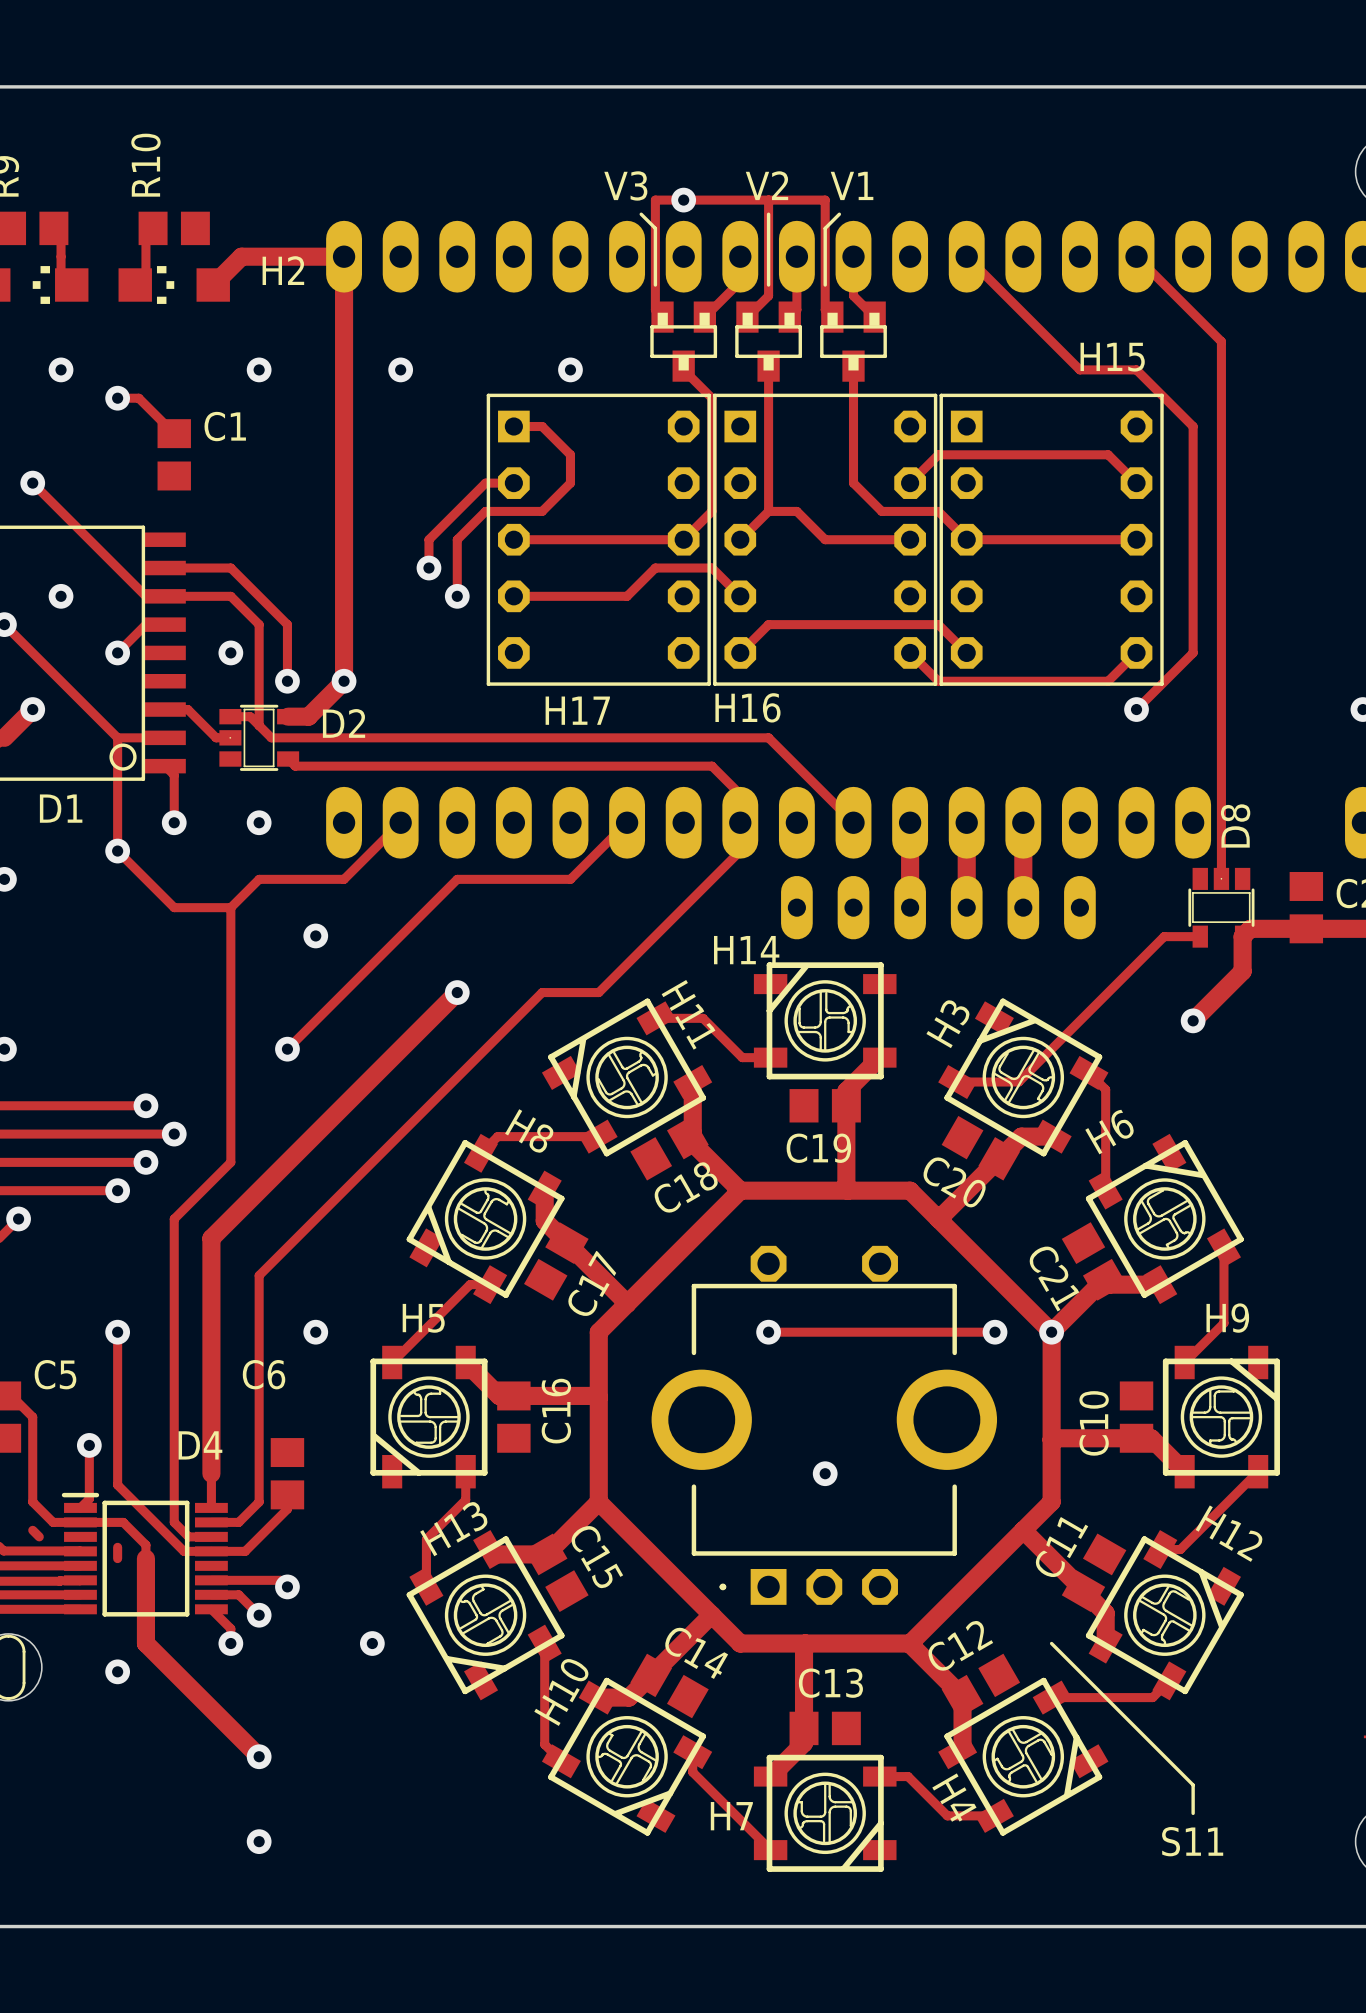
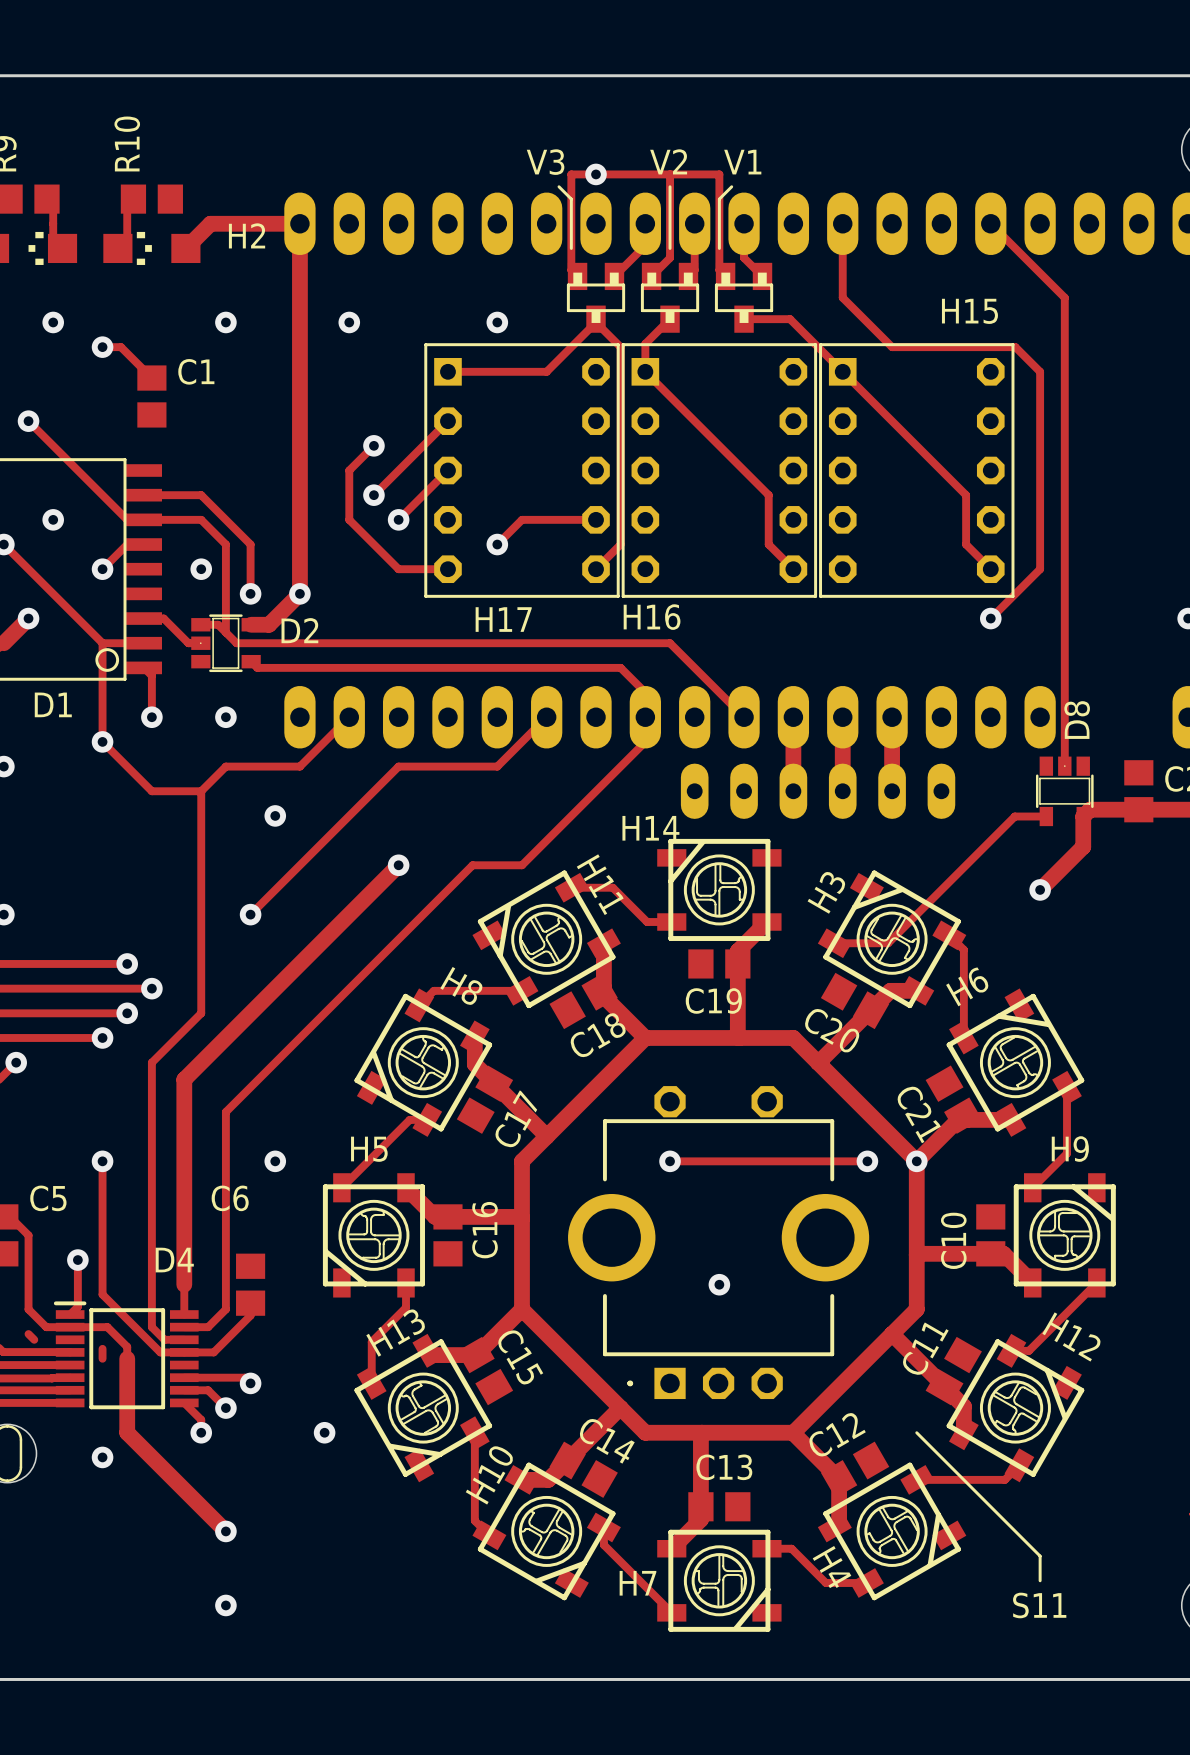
track: (966, 256) (1079, 369) (1136, 369) (1164, 398) -> (842, 223) (842, 297) (892, 347) (1015, 347)
track: (768, 366) (768, 511) -> (670, 319) (645, 343) (645, 371) (768, 495) (768, 544) (793, 569)
track: (853, 366) (853, 483) (881, 511) (938, 511) (966, 539) (1136, 539) -> (744, 319) (790, 319) (966, 495) (966, 544) (990, 569)
track: none -> (596, 322) (546, 371) (472, 371)
track: (542, 426) (570, 454) (570, 483) (542, 511) (485, 511) -> (447, 421) (423, 445)
track: (513, 483) (485, 483) (428, 539) (428, 568) -> none
track: (910, 483) (938, 454) (1108, 454) (1136, 483) -> none
track: none -> (373, 445) (349, 470) (349, 519) (398, 569) (447, 569)
via: none -> (373, 445)
track: (711, 511) (683, 539) (513, 539) -> (620, 445) (620, 544) (596, 569)
track: (768, 511) (796, 511) (825, 539) (910, 539) -> none
track: (768, 511) (740, 539) -> none
track: (457, 539) (457, 596) -> (398, 470) (373, 495)
track: none -> (447, 470) (398, 519)
track: (513, 596) (598, 596) -> (497, 544) (521, 519)
track: (627, 596) (655, 568) (711, 568) (740, 596) -> (546, 519) (596, 519)
via: none -> (497, 544)
track: (740, 652) (768, 624) (938, 624) (966, 652) -> none
track: (910, 652) (938, 681) (1108, 681) (1136, 652) -> none

